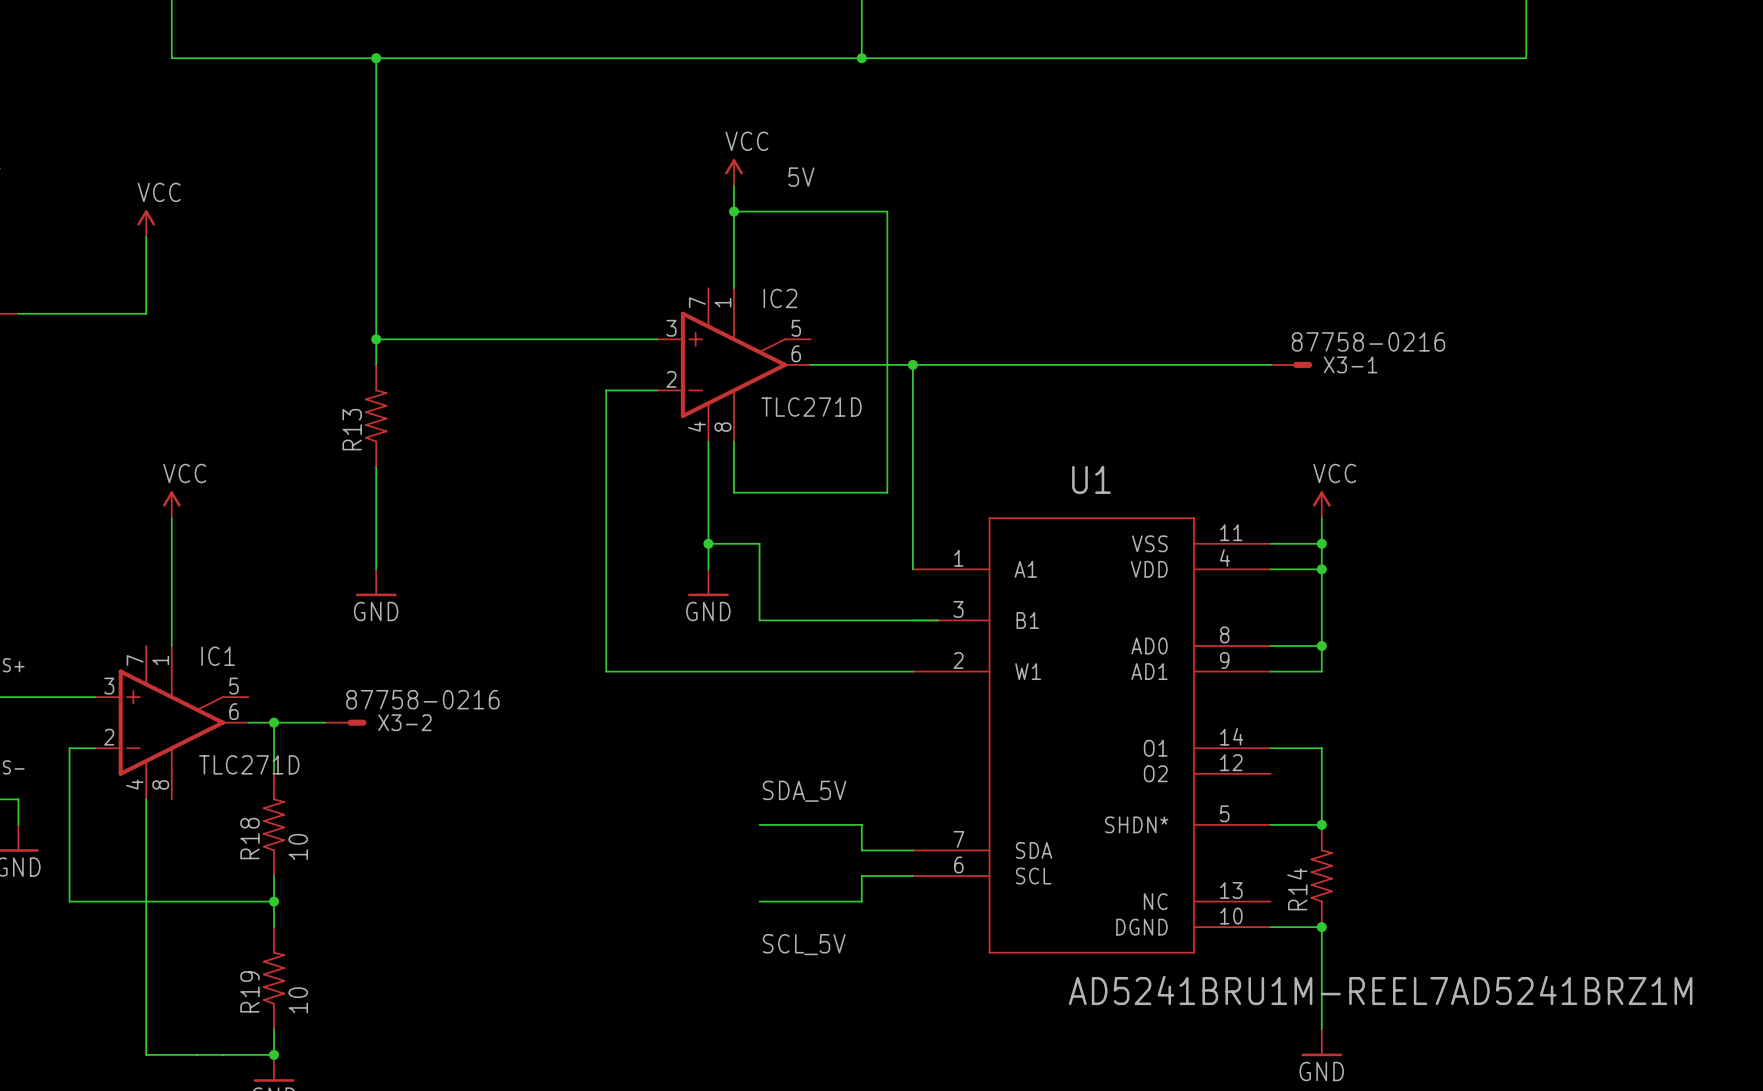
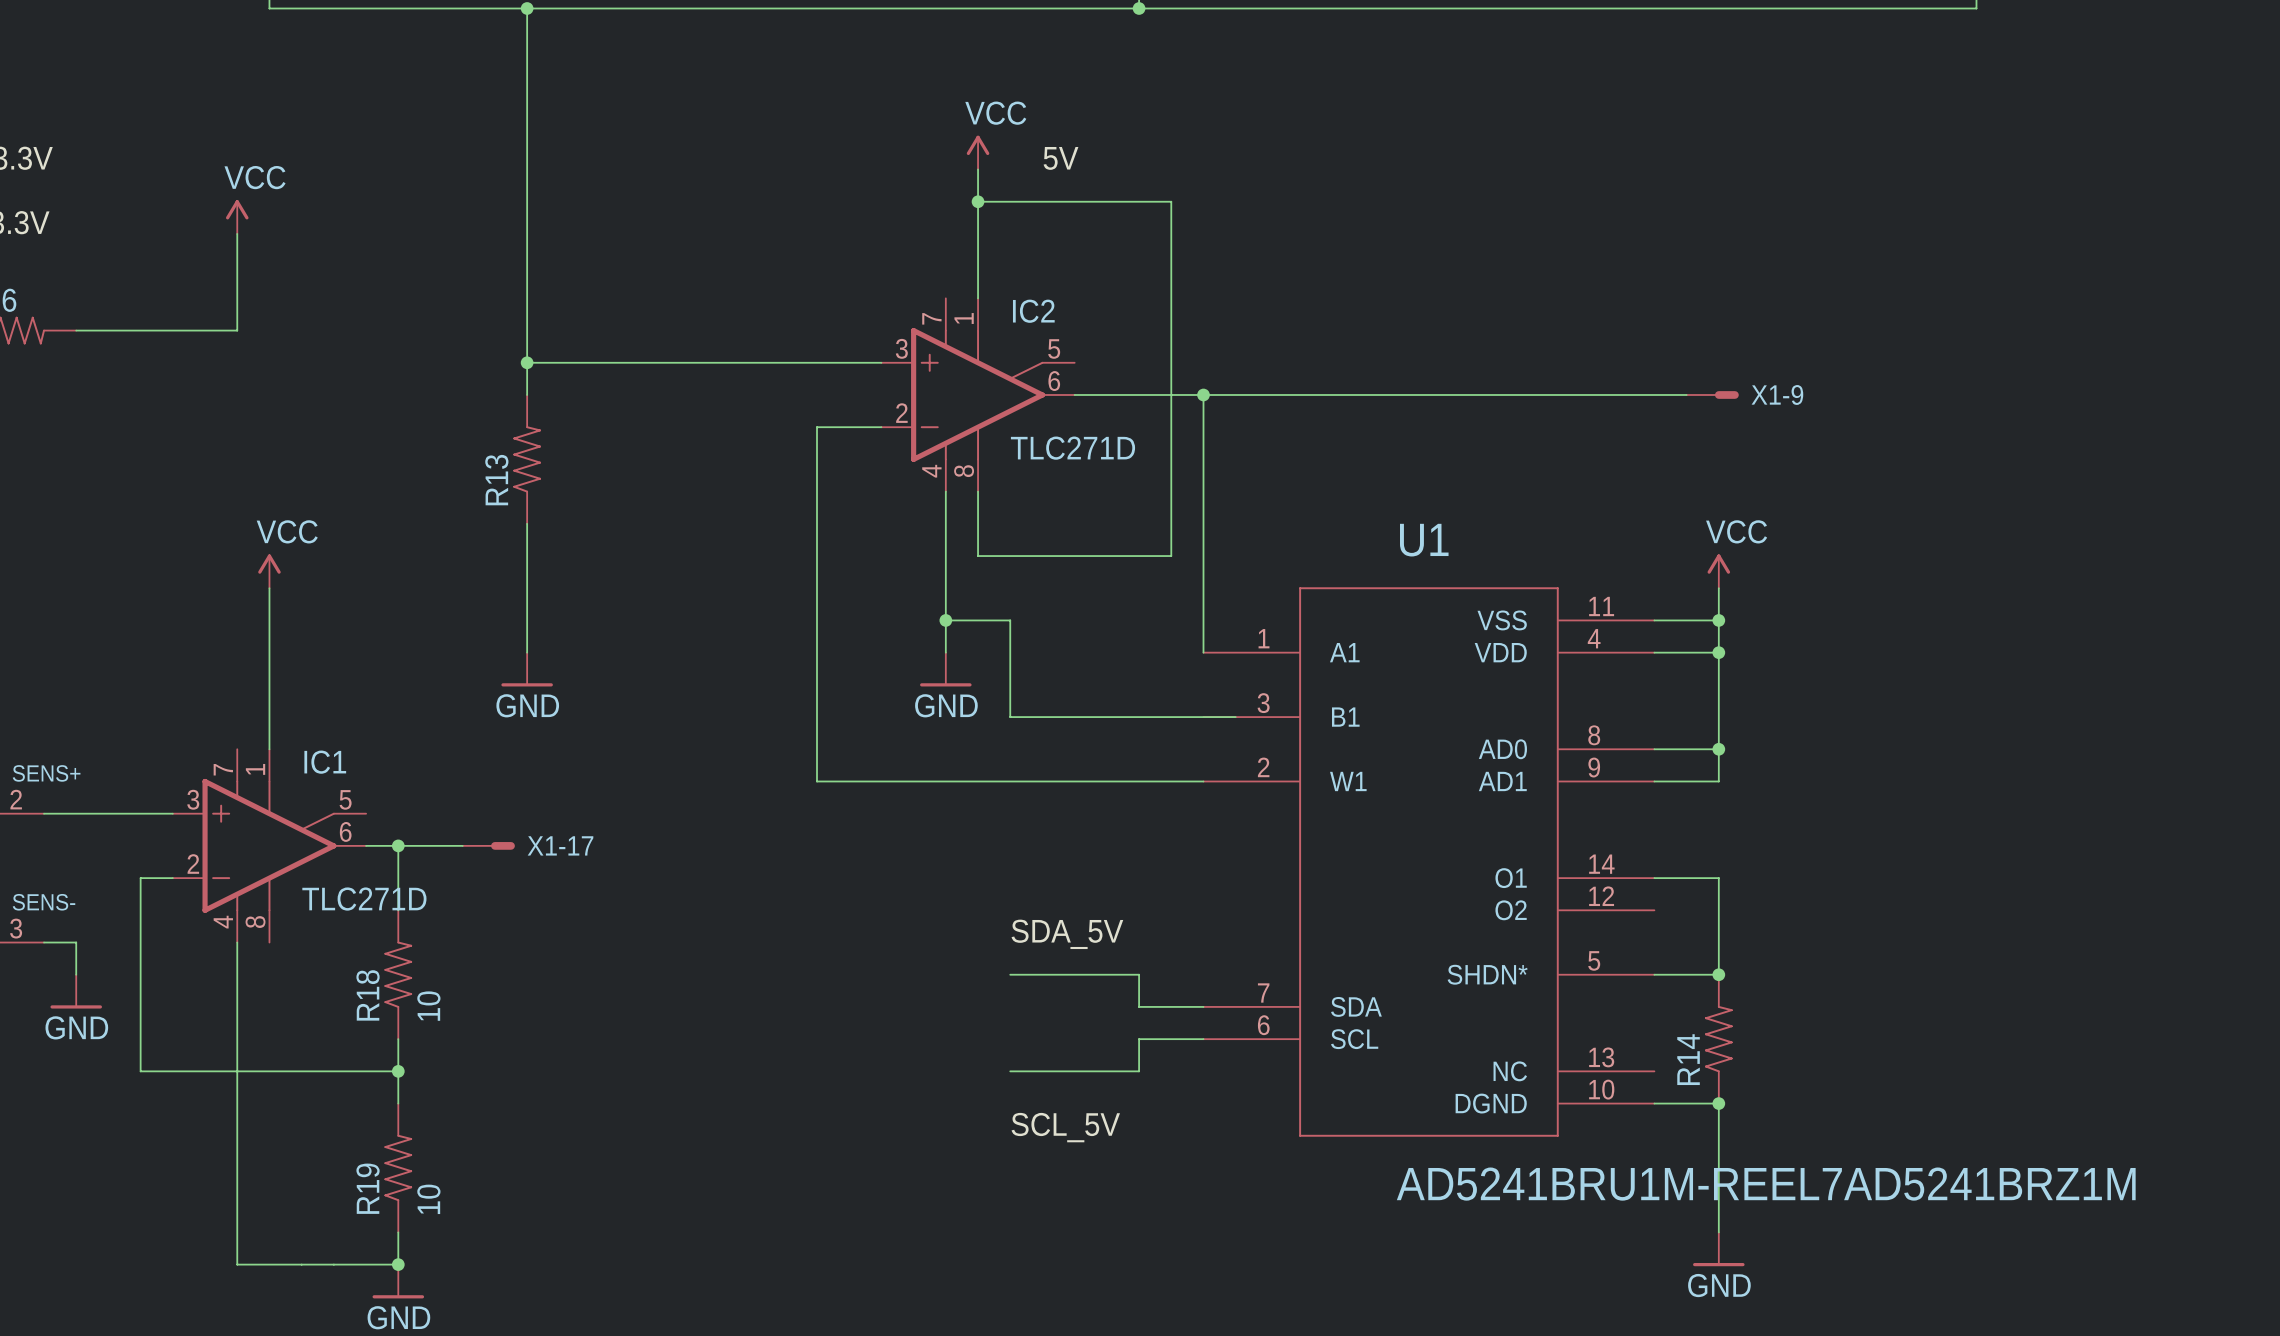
X3-1: 87758-0216 (1291, 364) -> none
X1-9: none -> (1712, 394)
X3-2 value: 87758-0216 (422, 699) -> none
X3-2 name: X3-2 (404, 722) -> X1-17 (560, 845)

